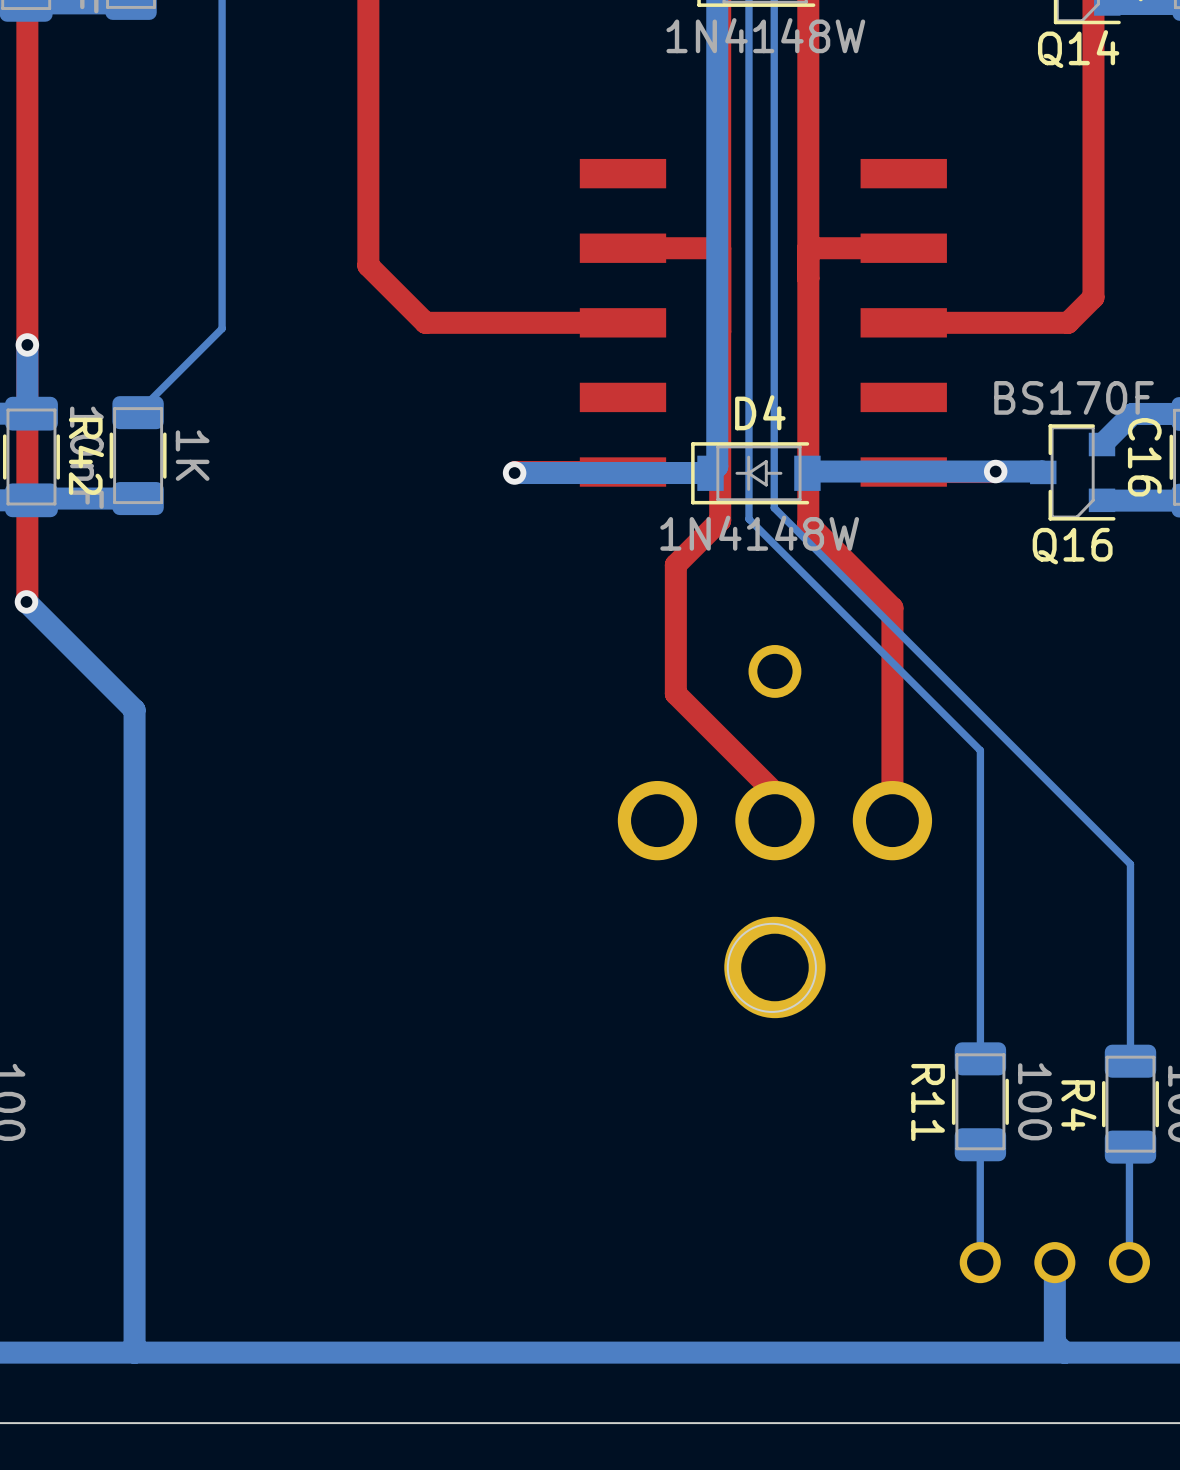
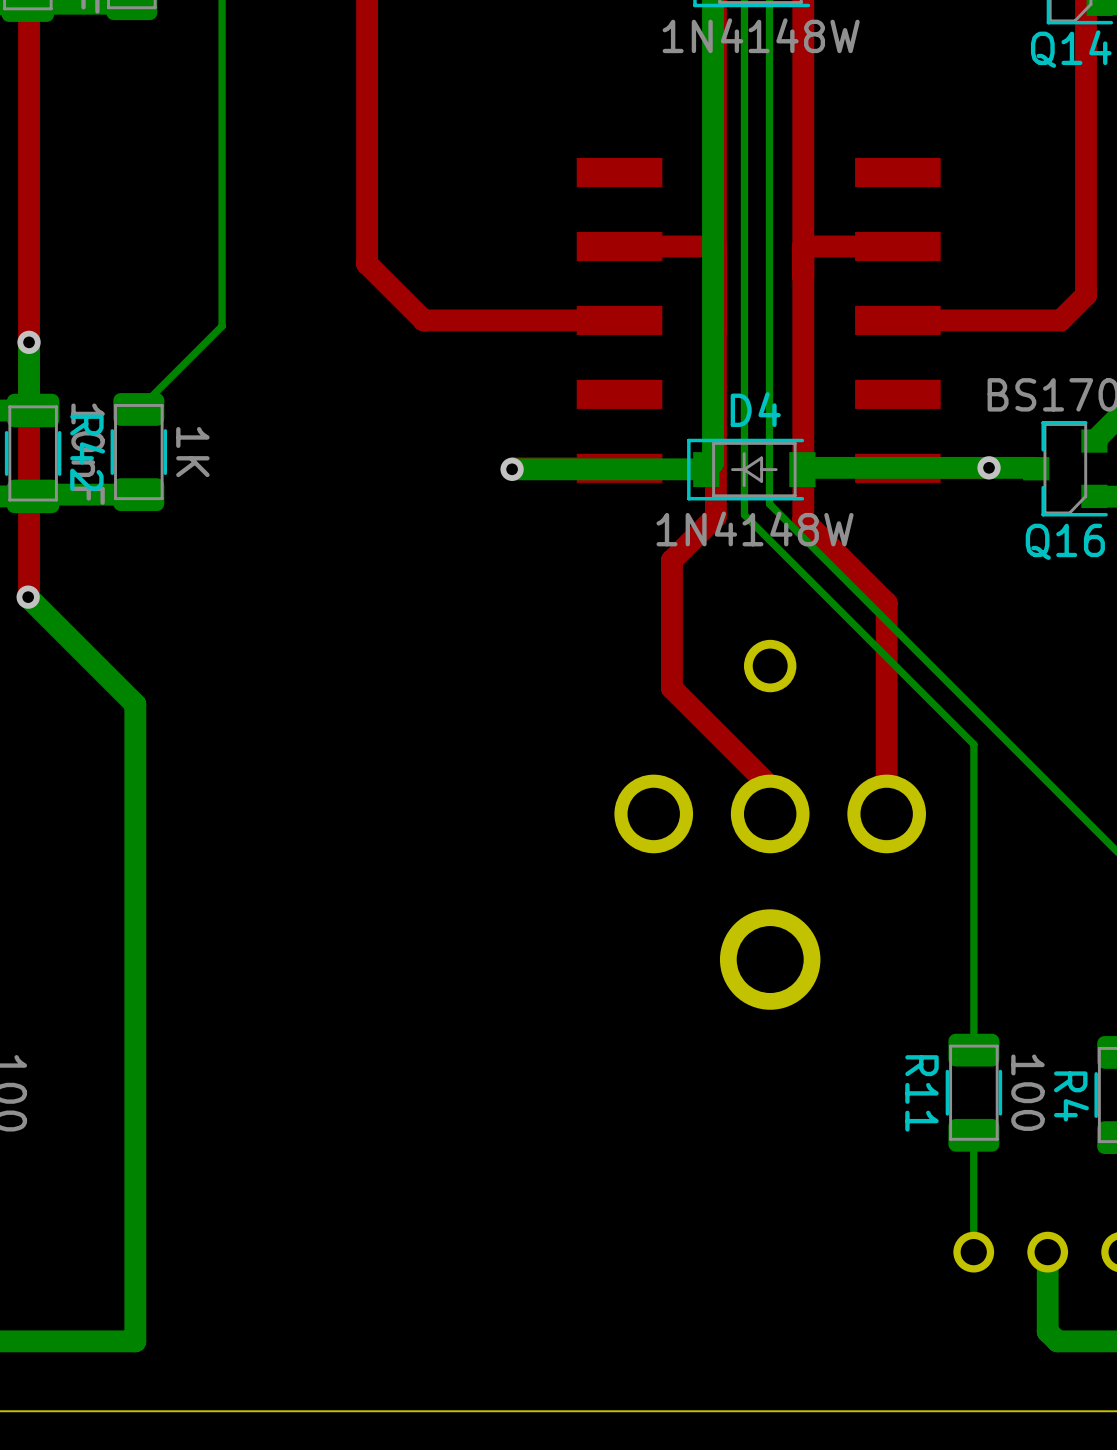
bottom track: (1064, 1352) (134, 1352) -> none

